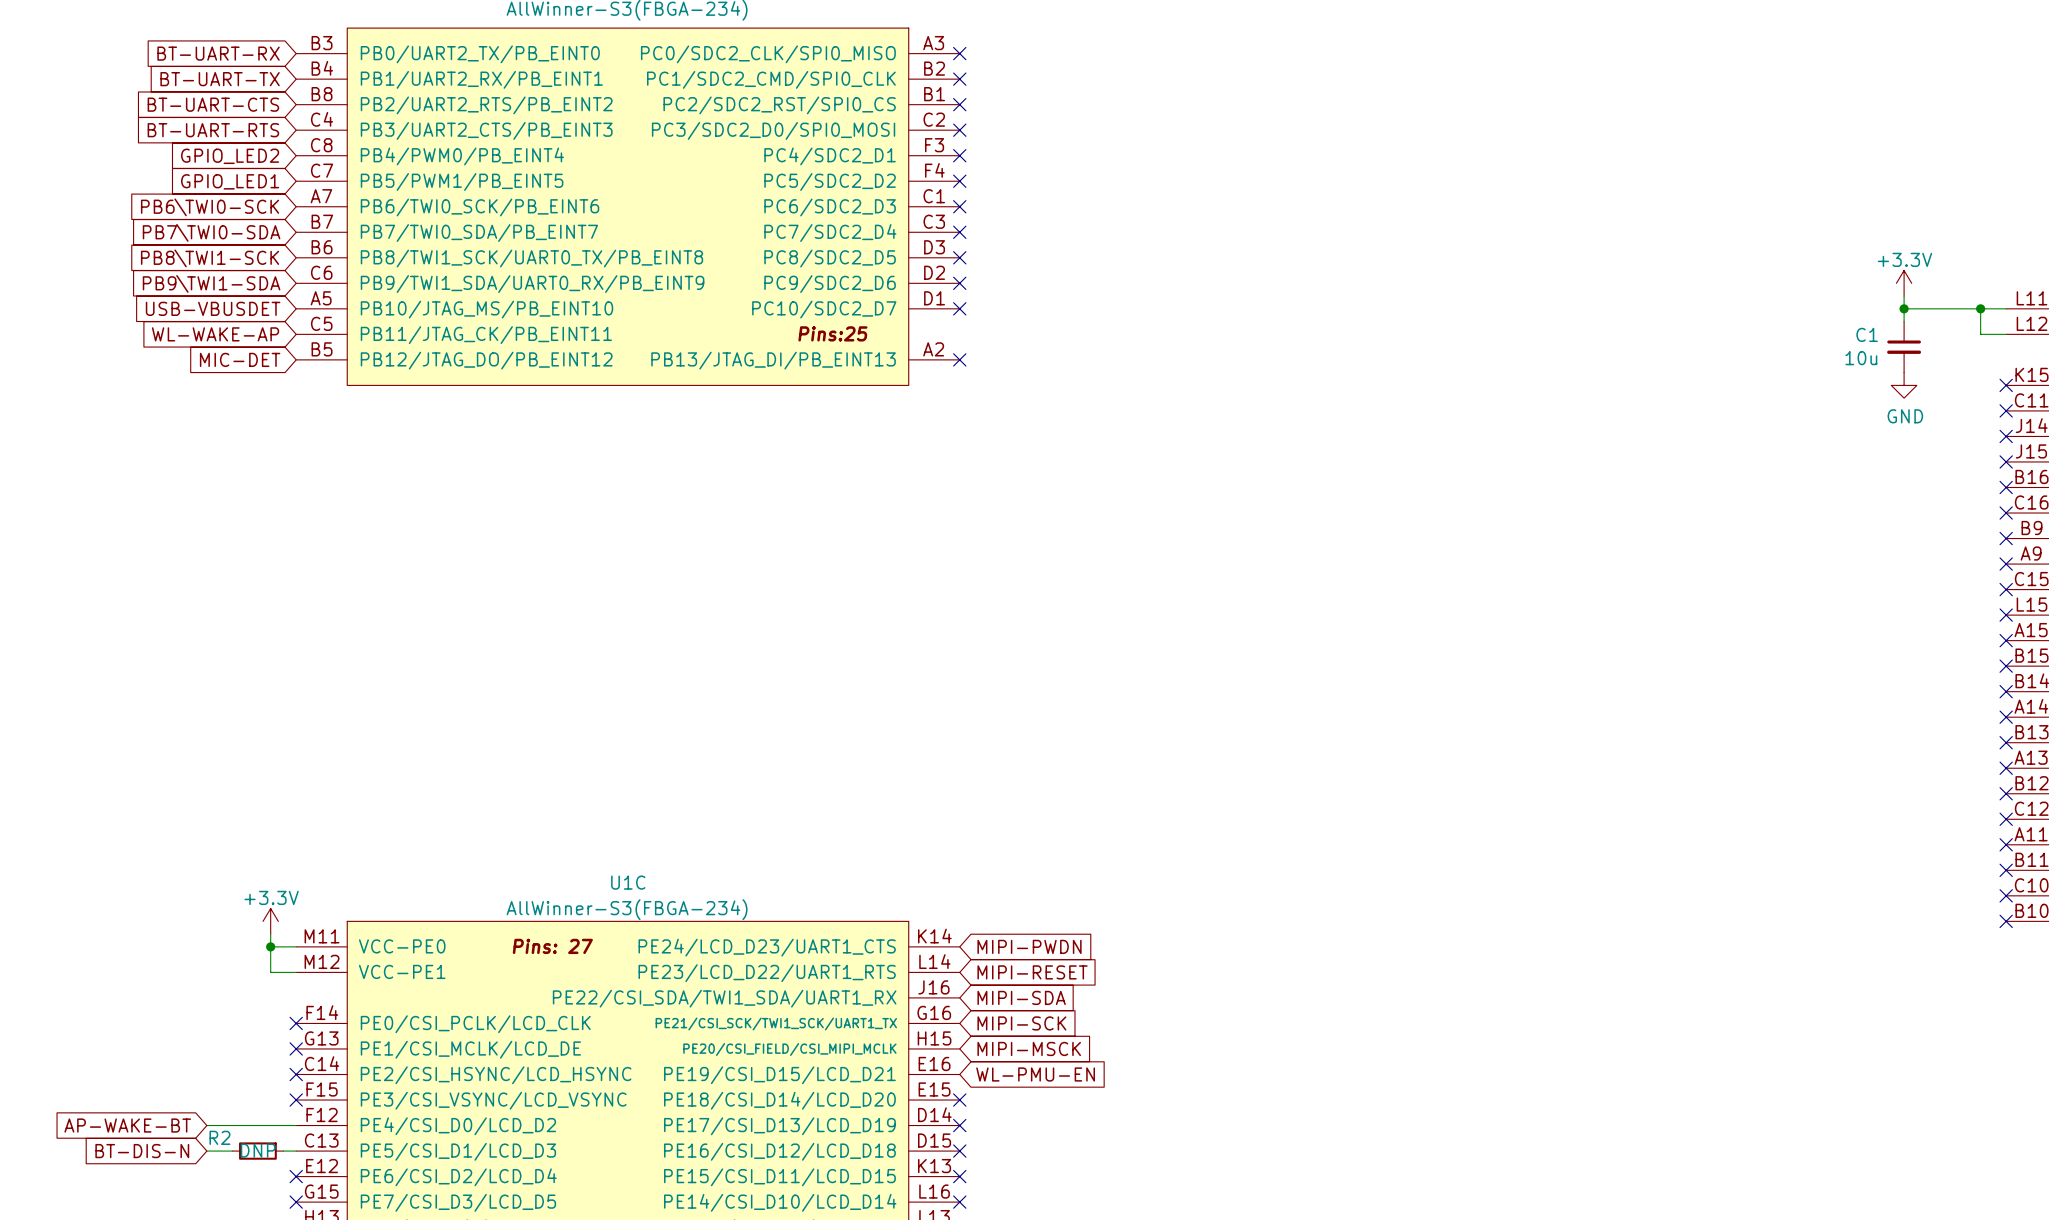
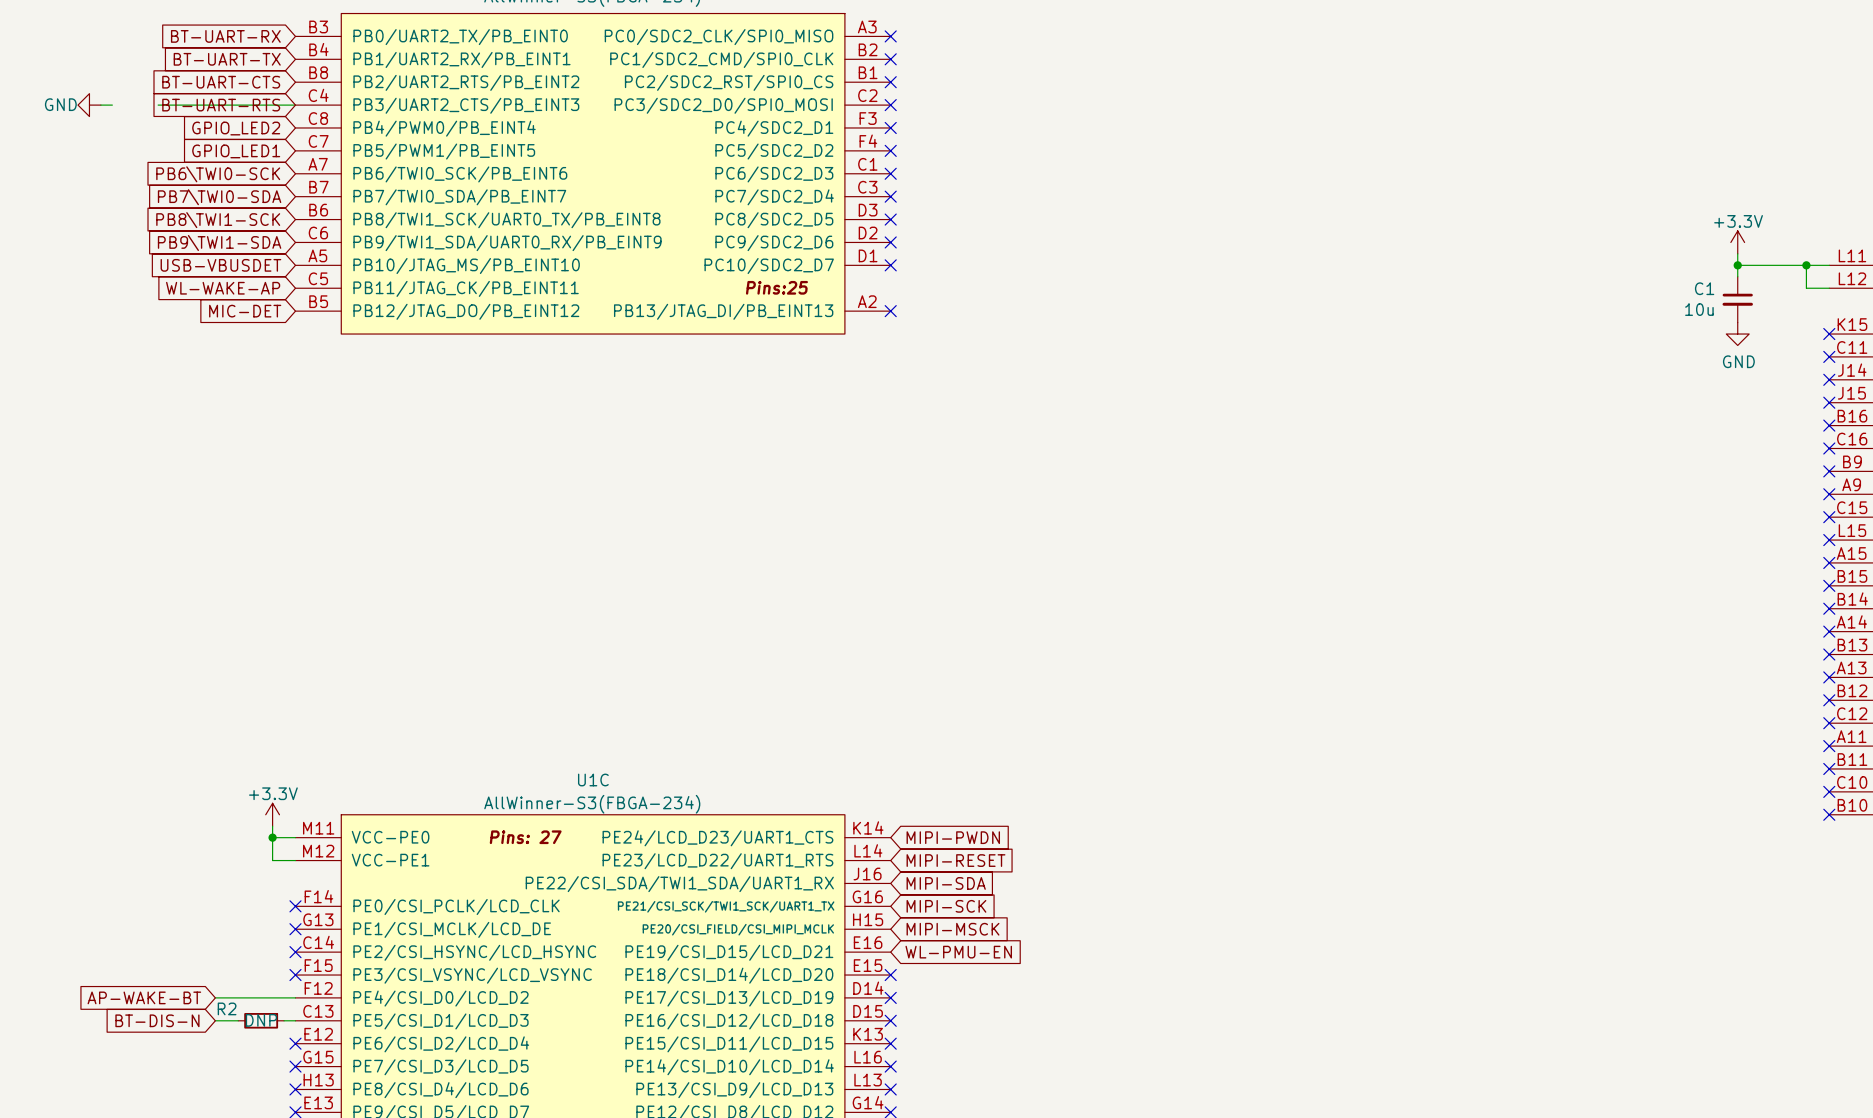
power symbol: none -> GND (89, 105)
wire: none -> (100, 105) (112, 105)
wire: none -> (158, 105) (295, 105)

